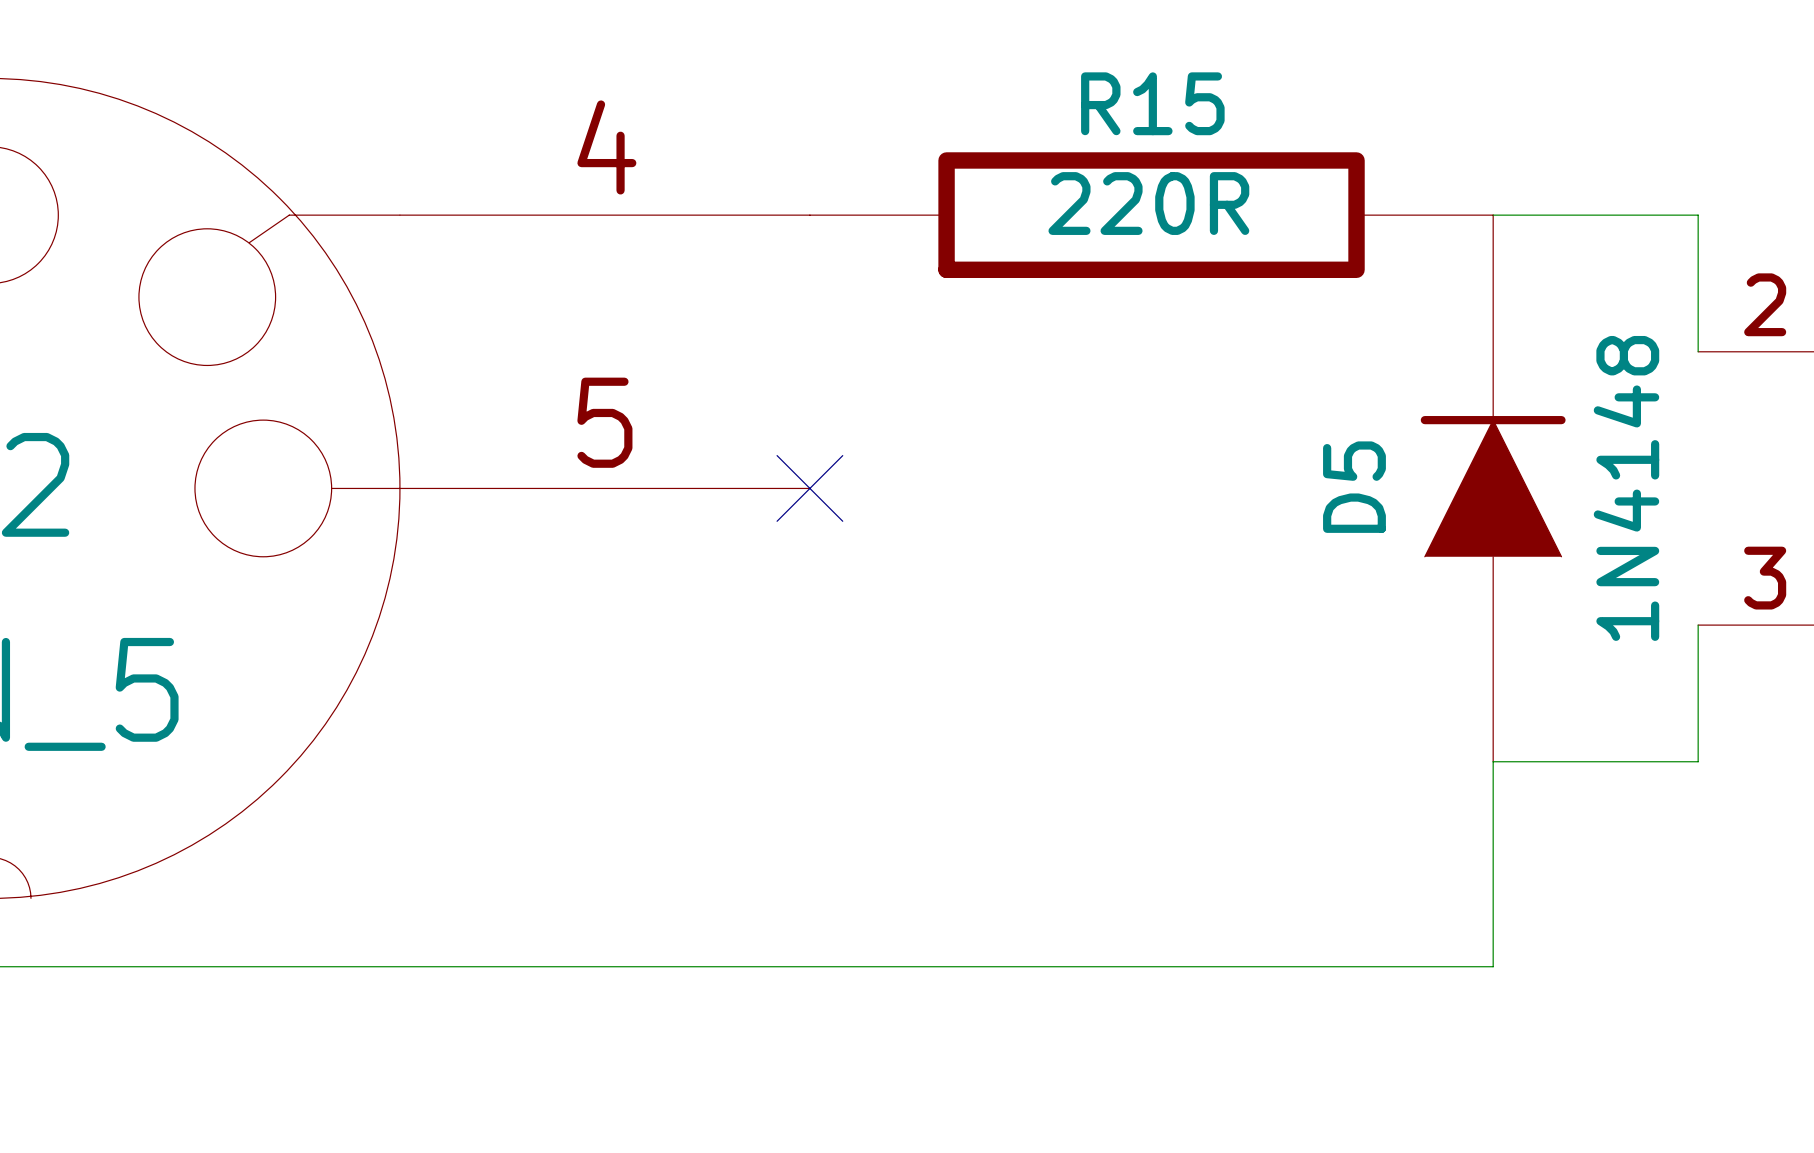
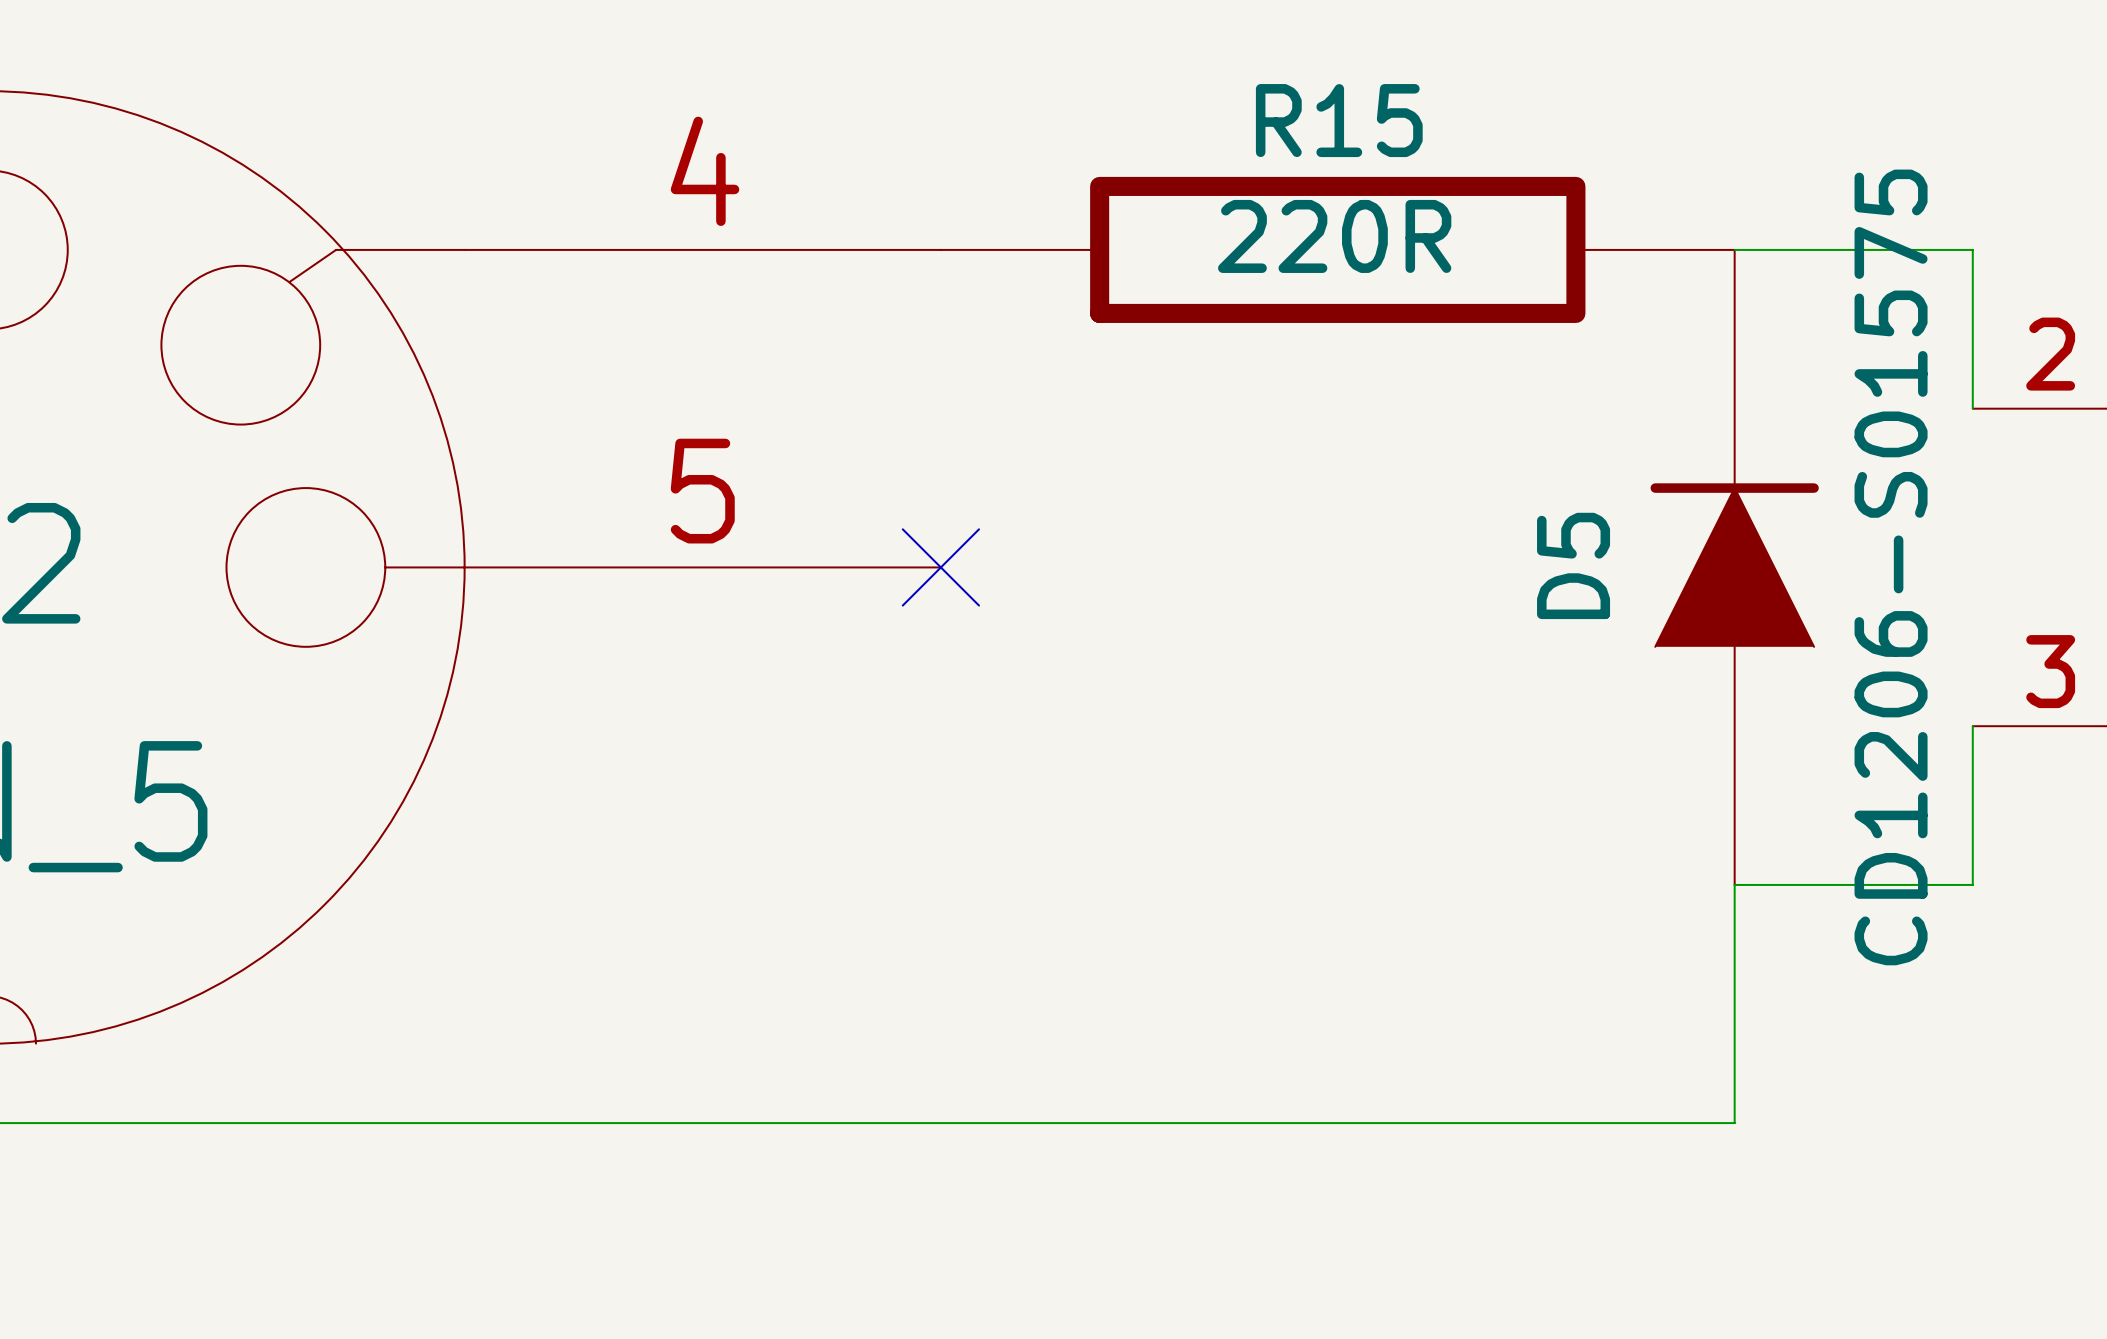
D5 value: 1N4148 (1626, 488) -> CD1206-S01575 (1891, 567)

